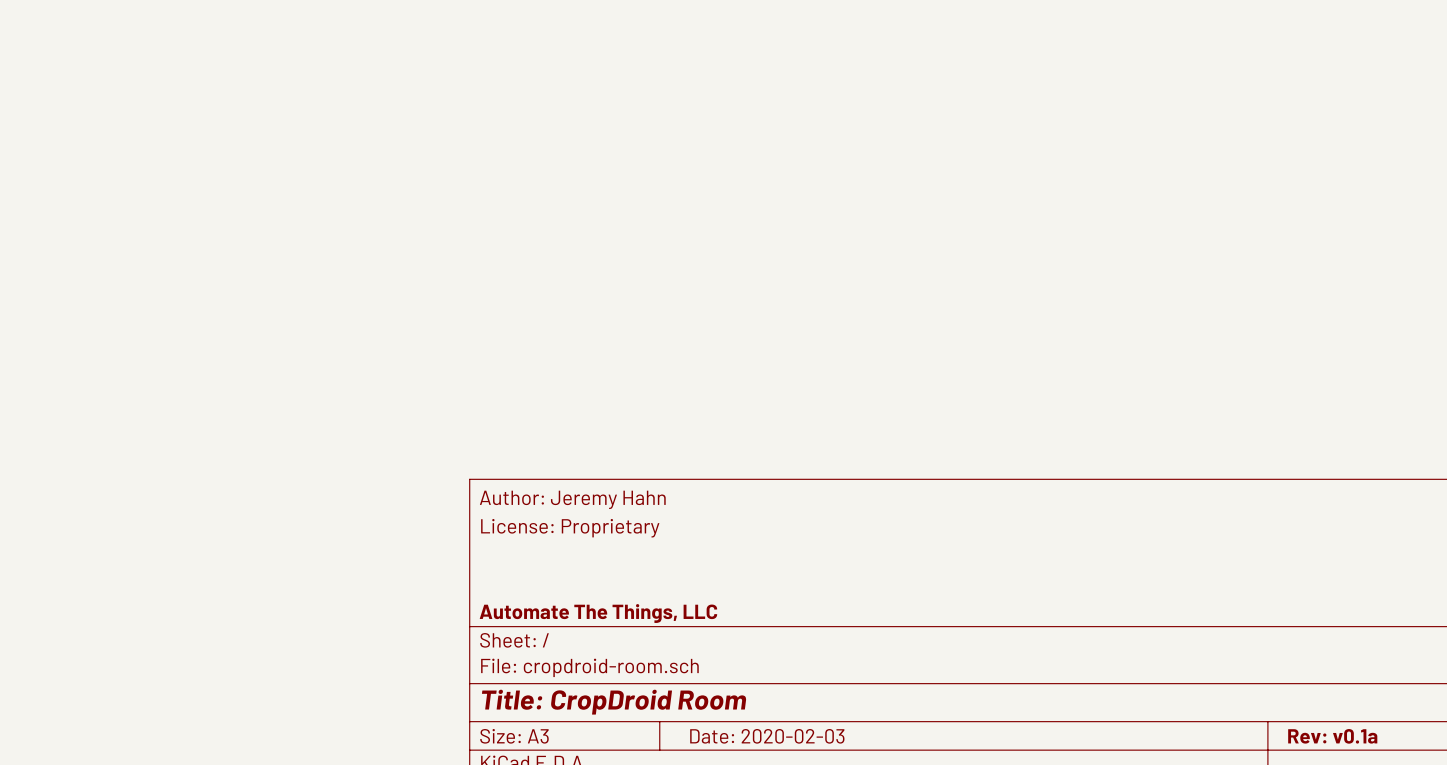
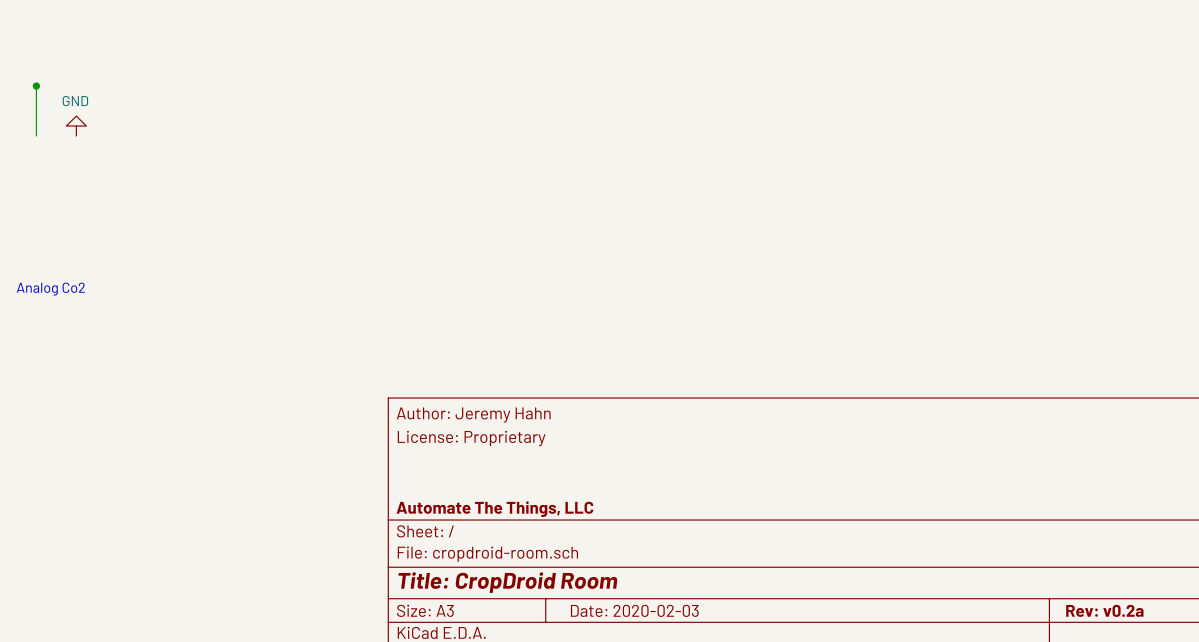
wire: none -> (36, 86) (36, 136)
junction: none -> (36, 86)
power symbol: none -> GND (76, 126)
text: none -> Analog Co2 (50, 289)
title block: Rev: v0.1a (1332, 736) -> Rev: v0.2a (1104, 610)

